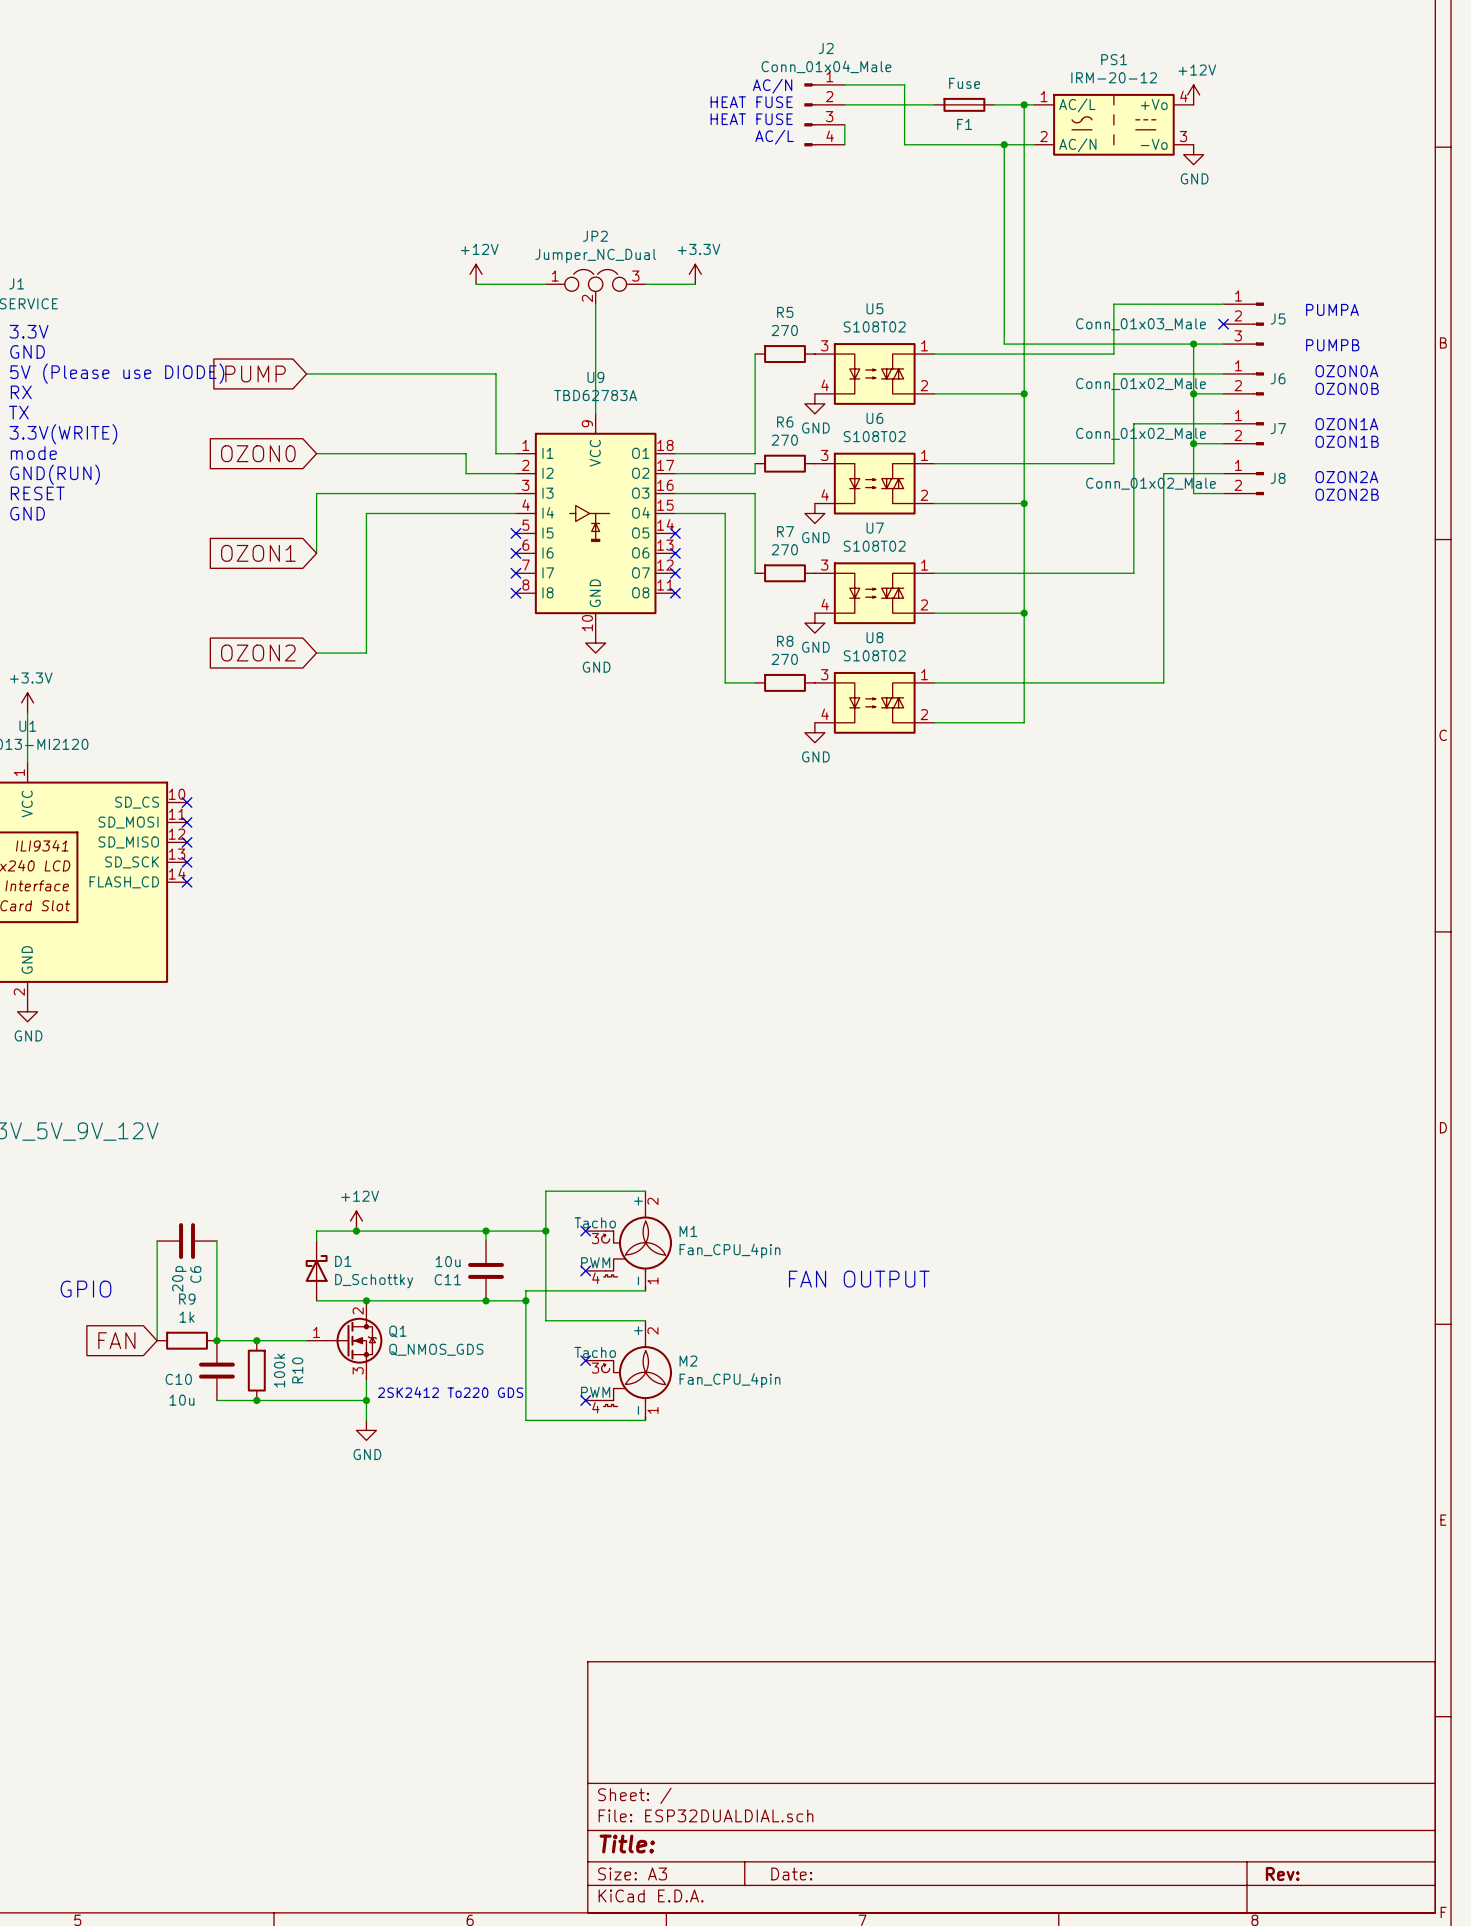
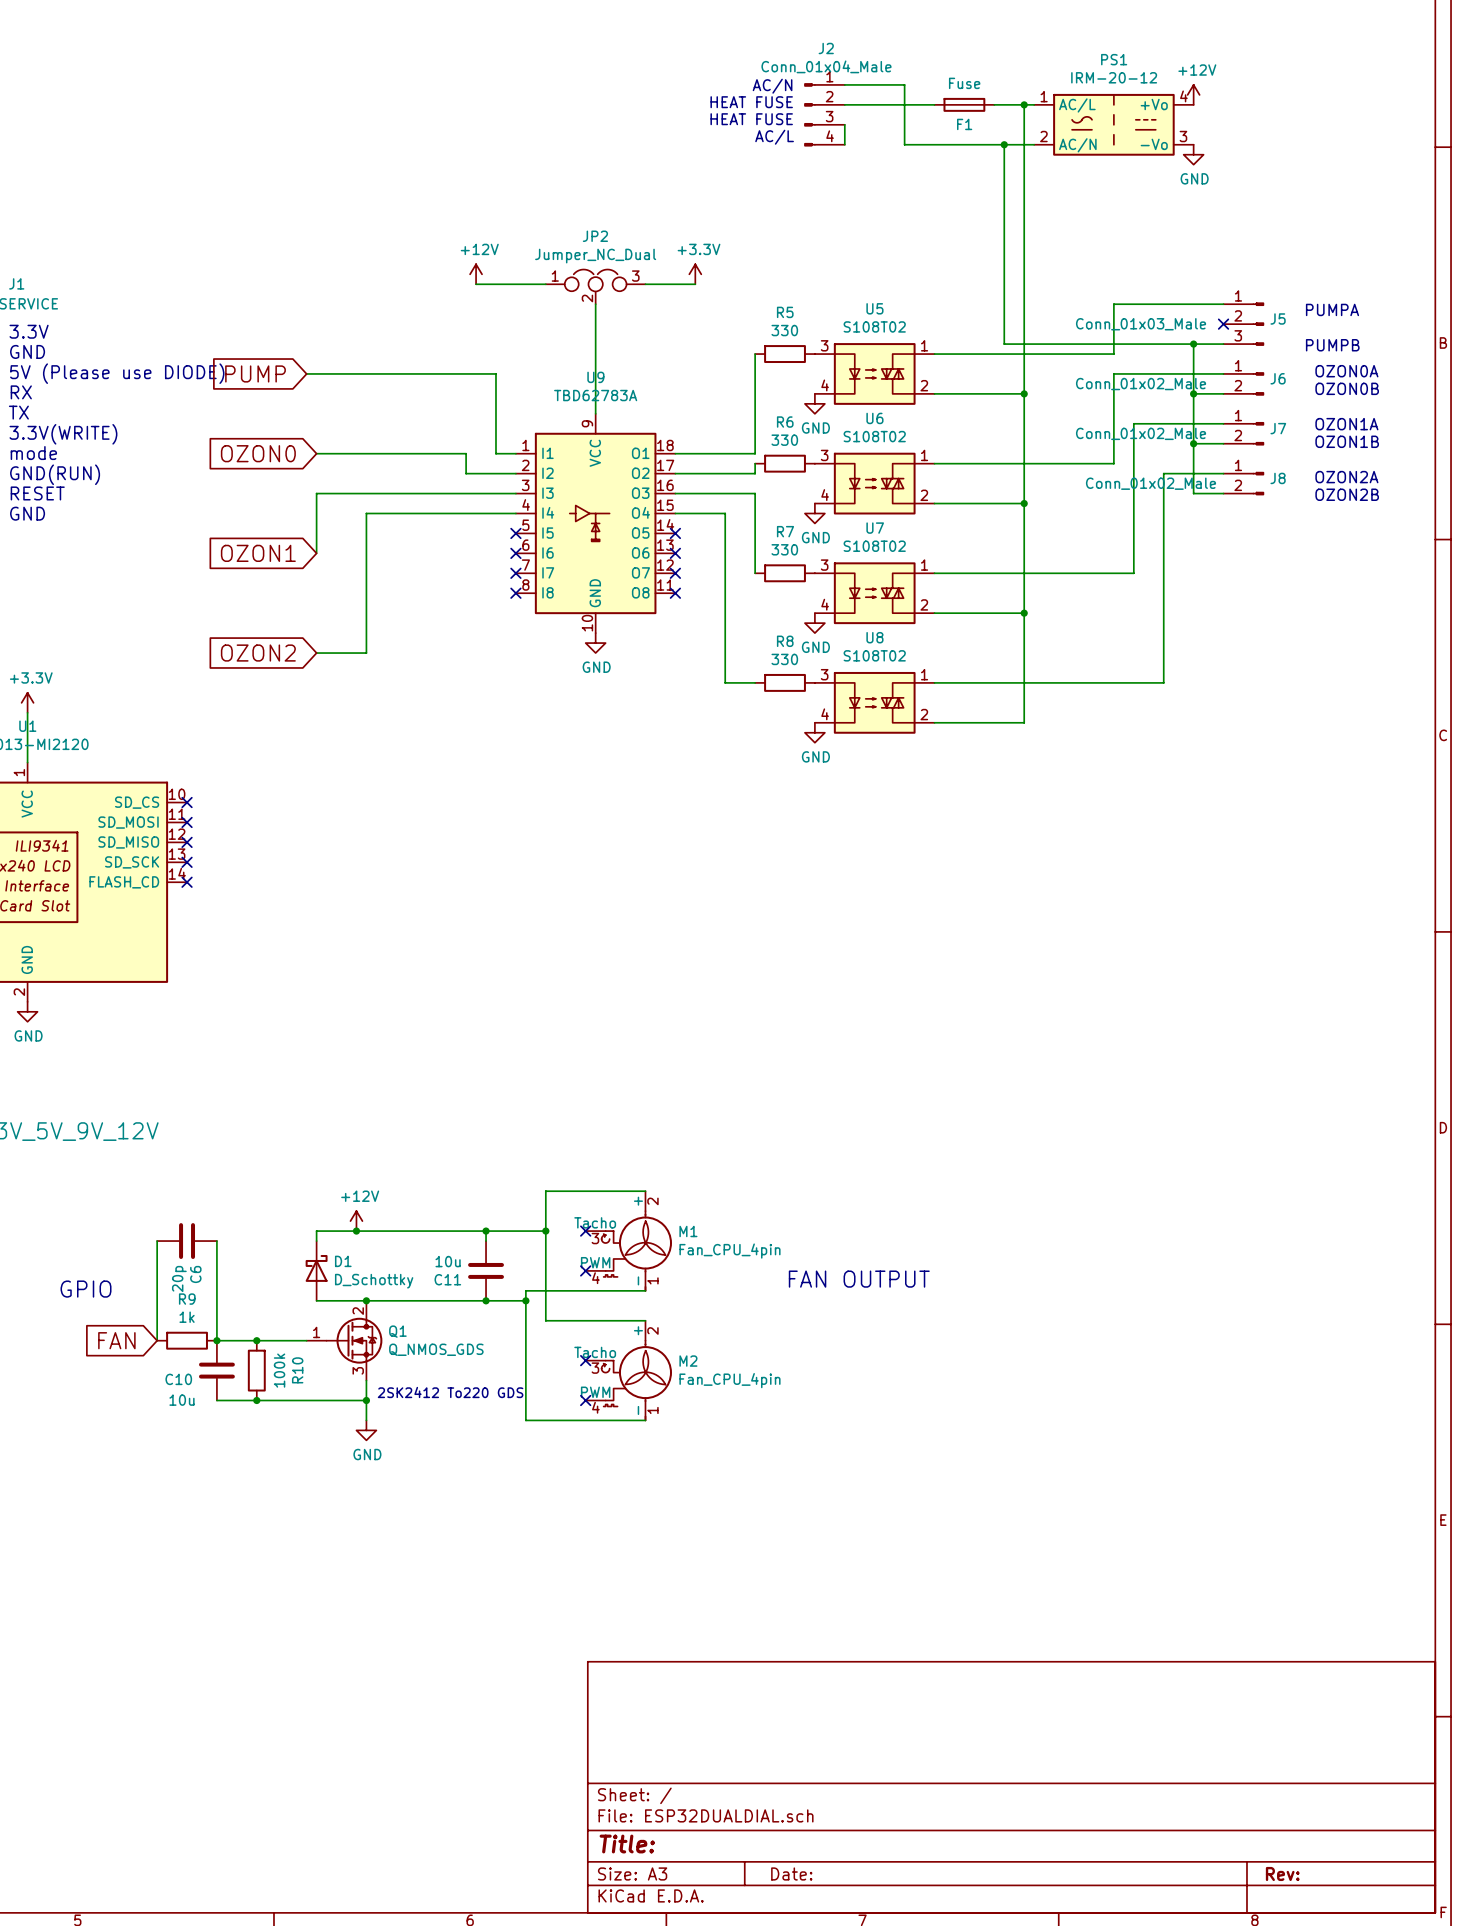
R5 value: 270 (784, 330) -> 330 (784, 330)
R6 value: 270 (784, 440) -> 330 (784, 440)
R7 value: 270 (784, 549) -> 330 (784, 549)
R8 value: 270 (784, 659) -> 330 (784, 659)

